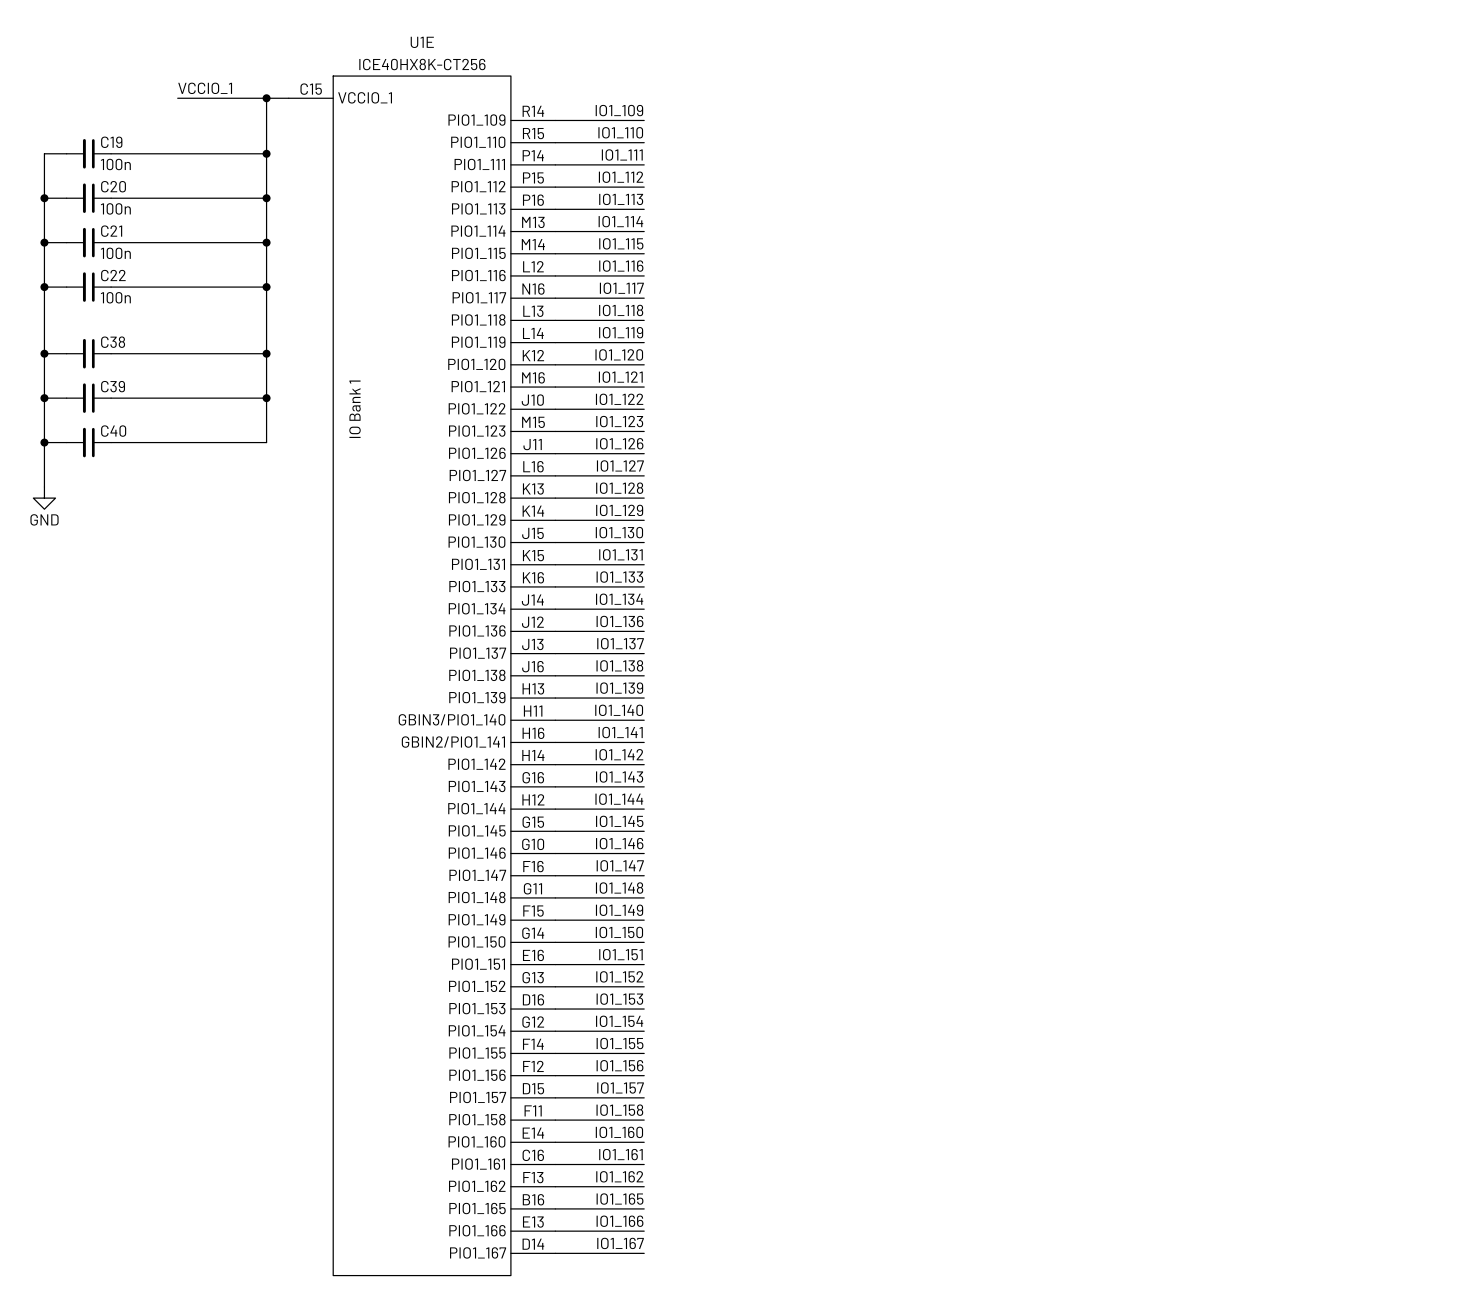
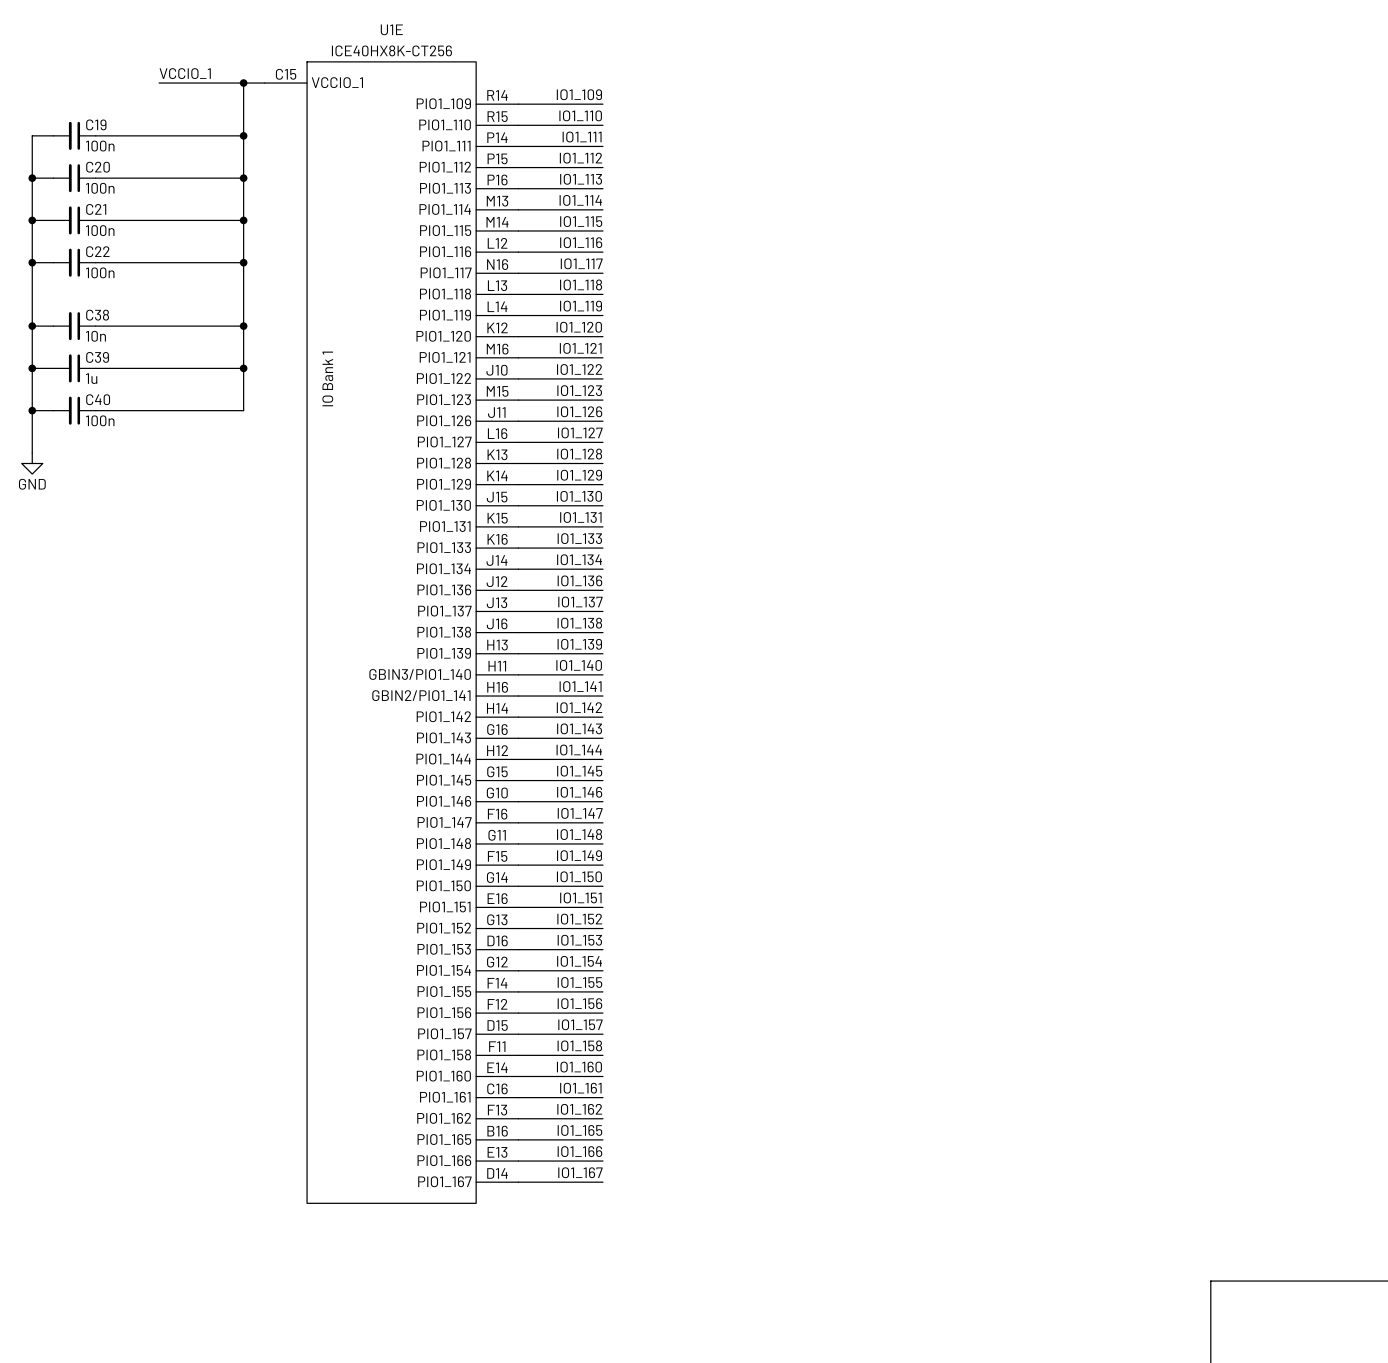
C38 value: none -> 10n (95, 336)
C39 value: none -> 1u (91, 378)
C40 value: none -> 100n (100, 420)

